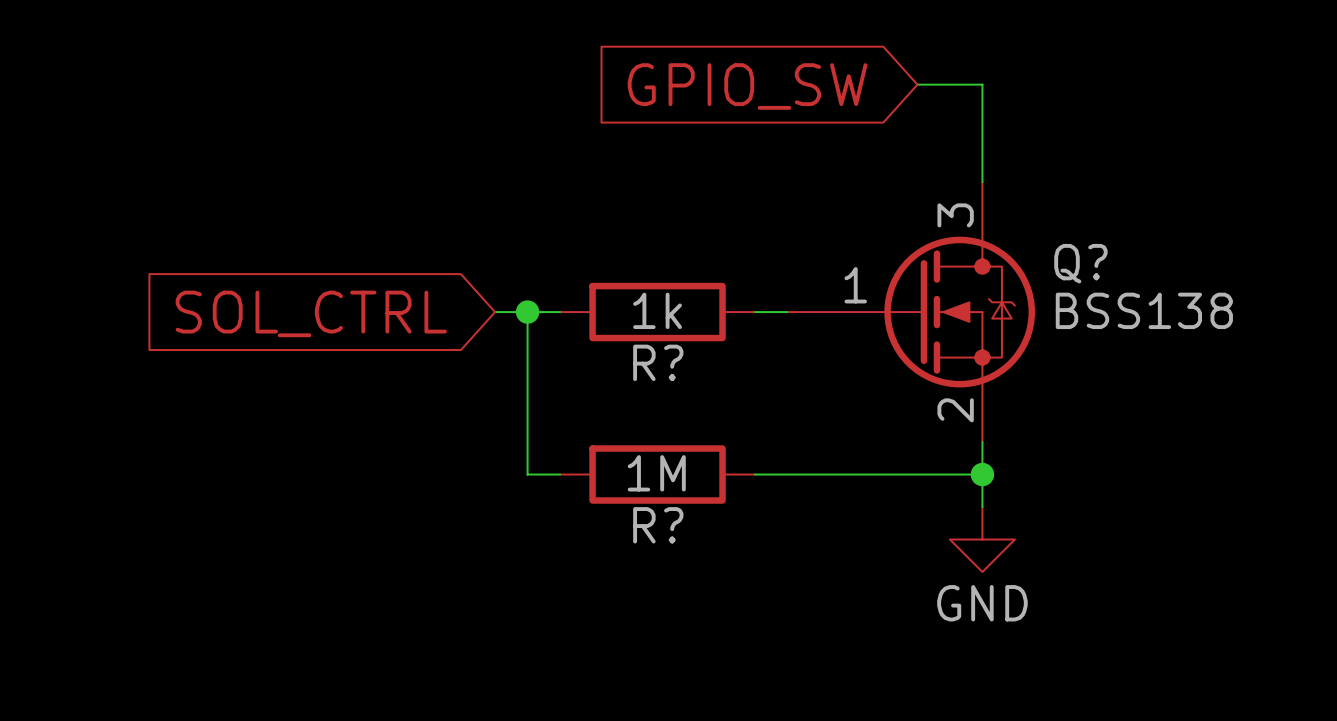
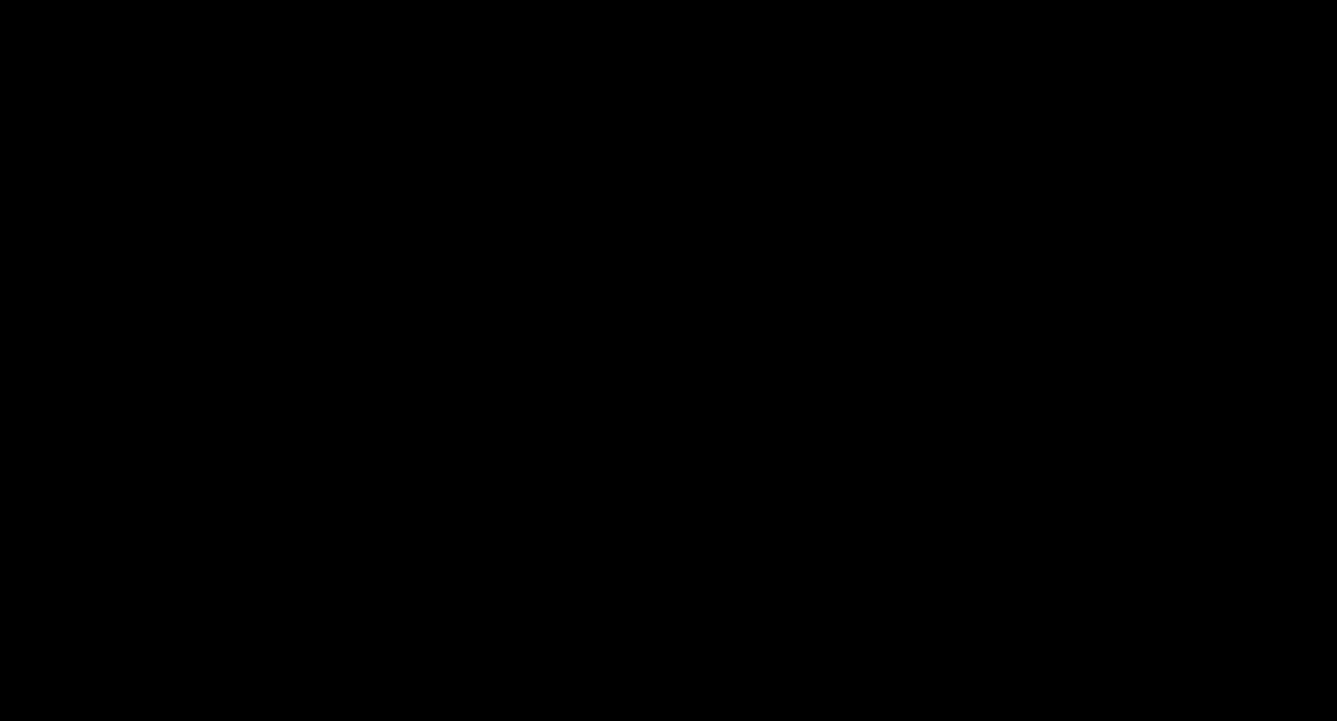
wire: (917, 84) (982, 84) (982, 182) -> none
global label: GPIO_SW (747, 86) -> none
wire: (495, 312) (560, 312) -> none
wire: (527, 312) (527, 474) (560, 474) -> none
junction: (527, 312) -> none
R?: 1k (657, 312) -> none
wire: (755, 312) (787, 312) -> none
Q?: BSS138 (911, 312) -> none
global label: SOL_CTRL (311, 313) -> none
wire: (982, 442) (982, 507) -> none
R?: 1M (657, 474) -> none
wire: (755, 474) (982, 474) -> none
junction: (982, 474) -> none
power symbol: GND (982, 539) -> none

